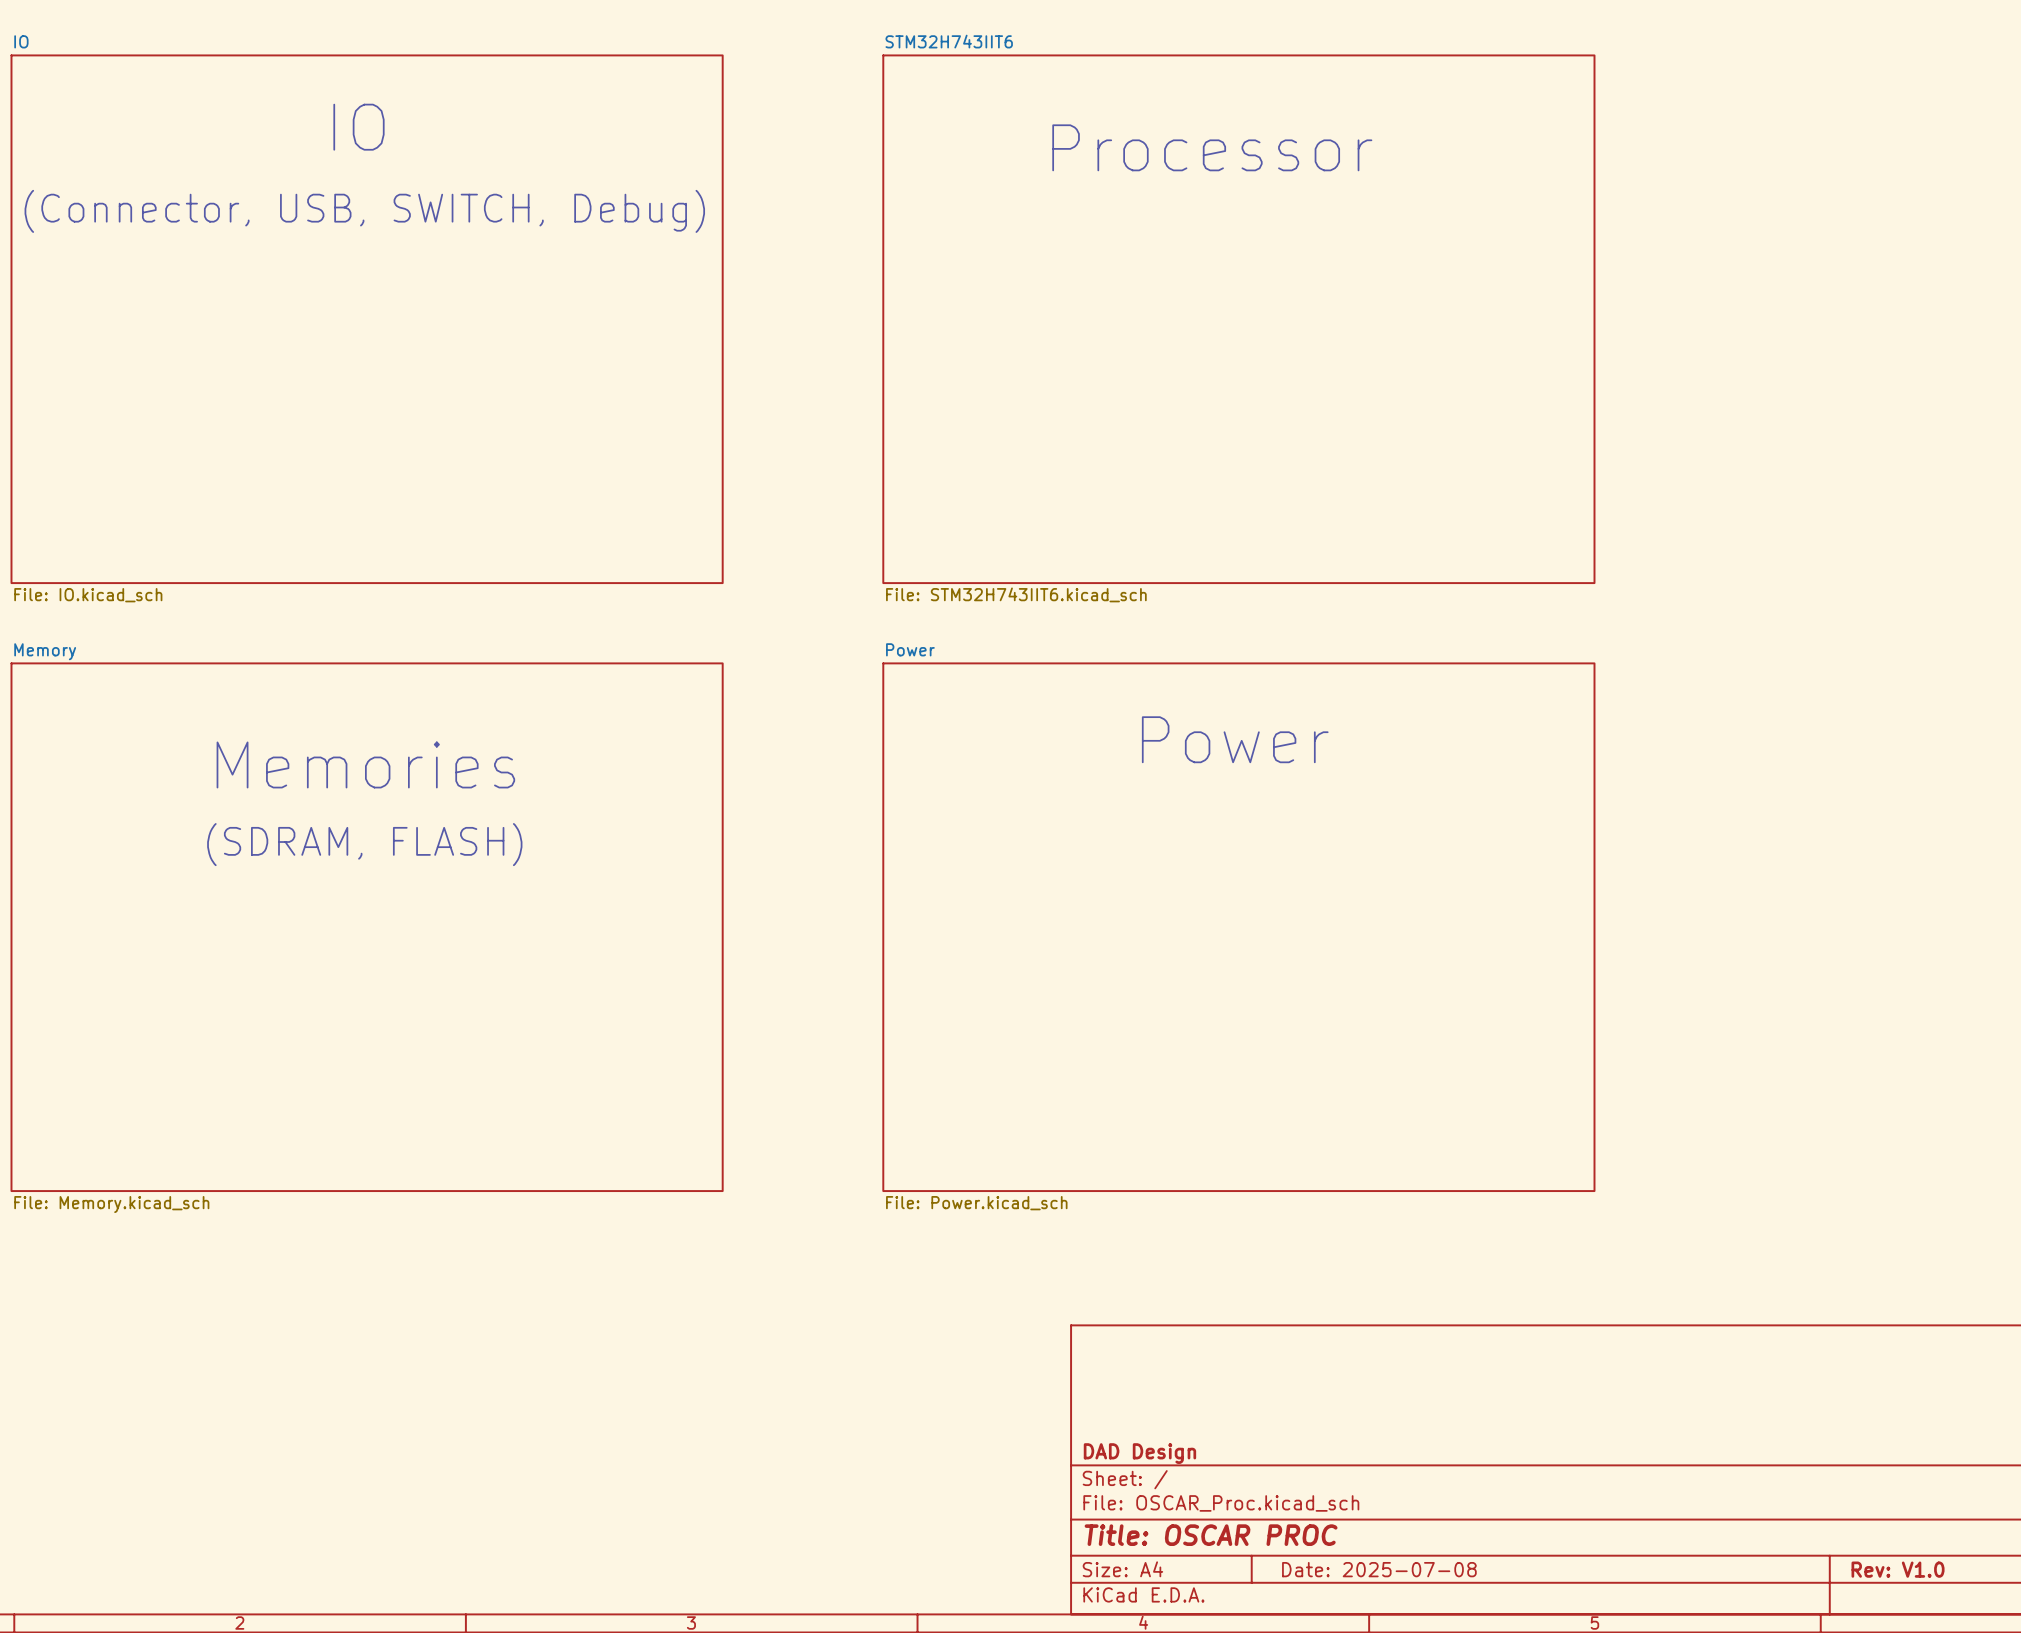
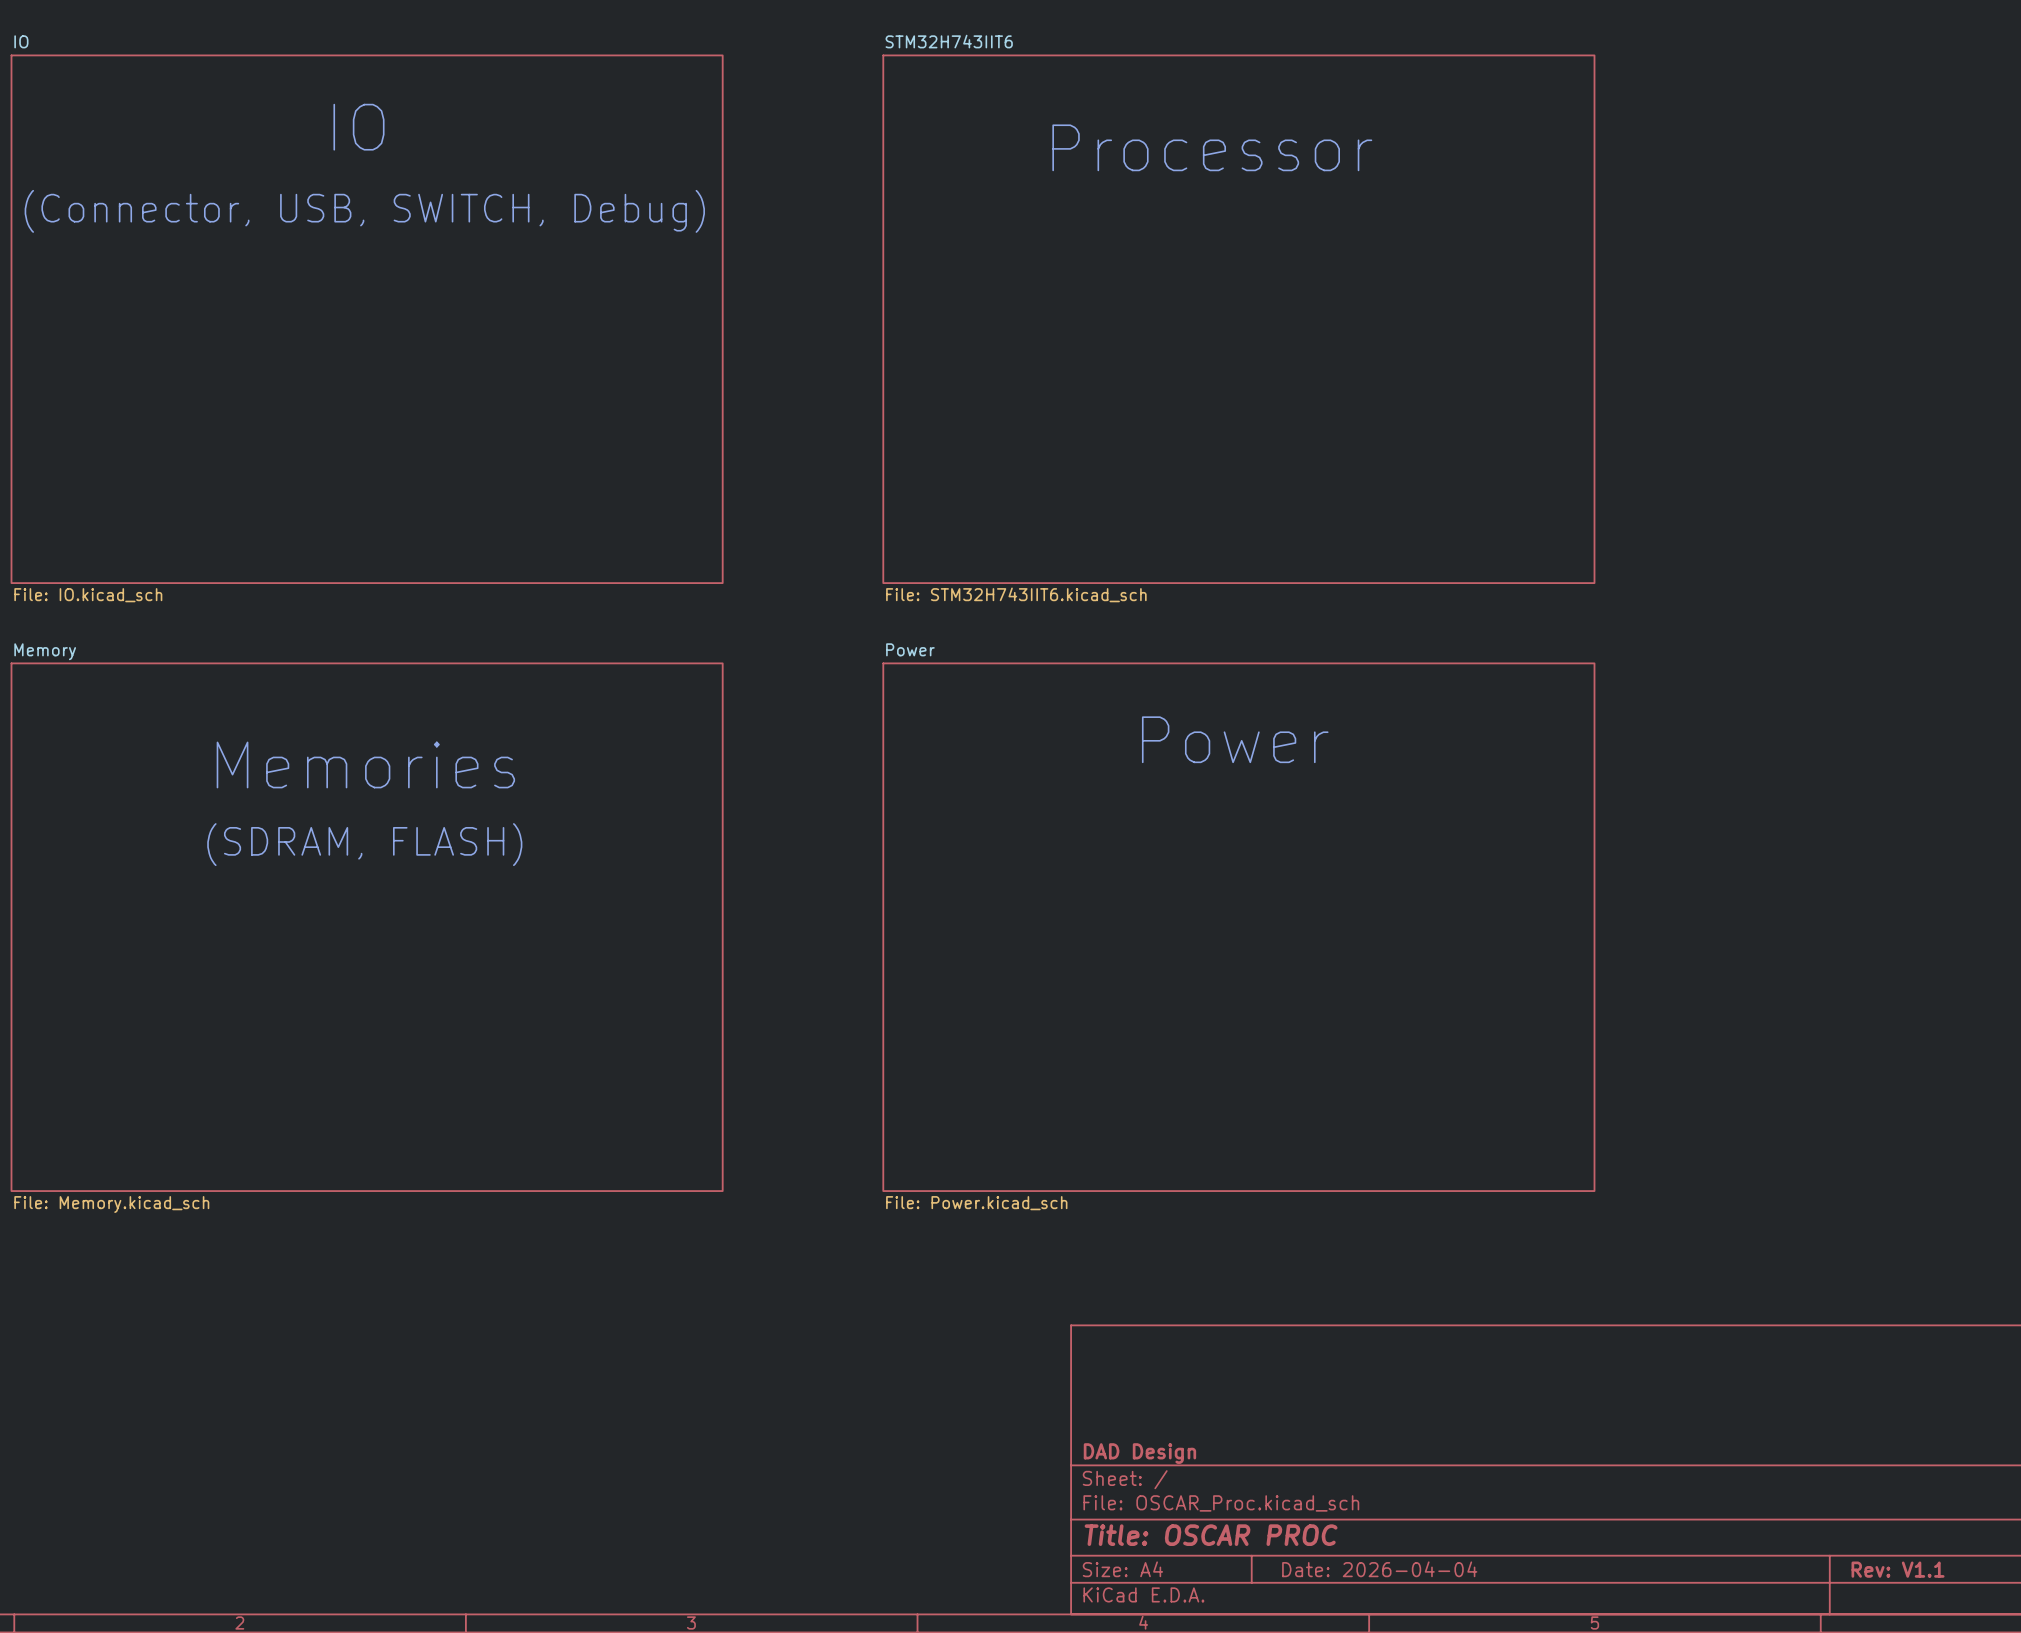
title block: Date: 2025-07-08 (1379, 1569) -> Date: 2026-04-04 (1379, 1569)
title block: Rev: V1.0 (1898, 1569) -> Rev: V1.1 (1898, 1569)

